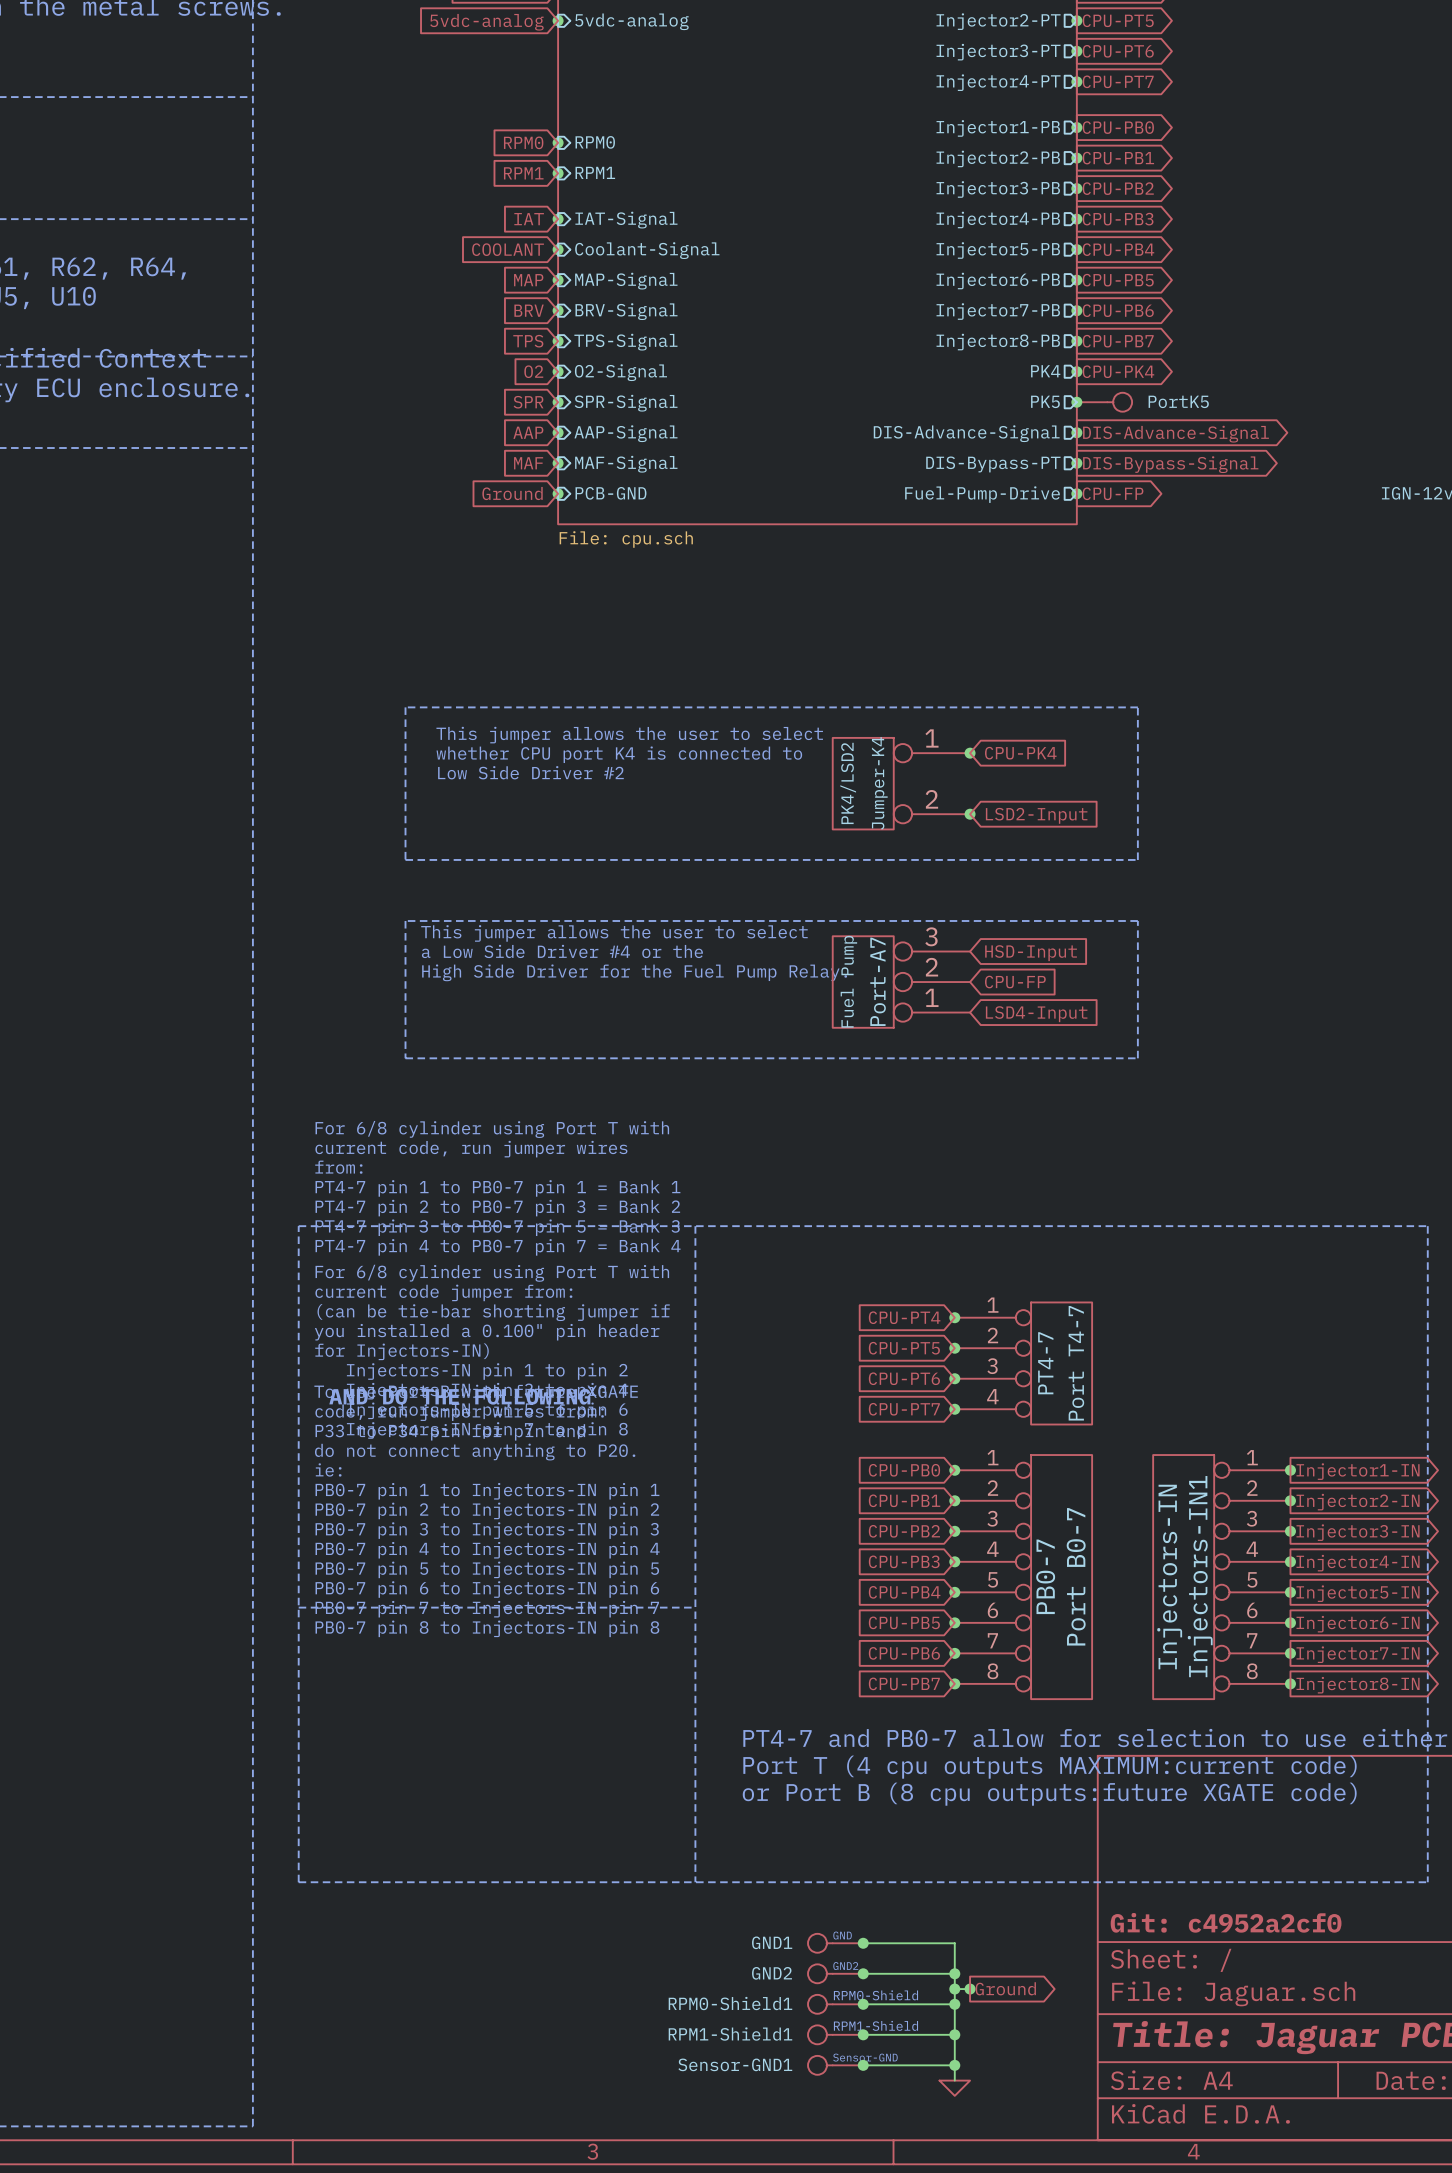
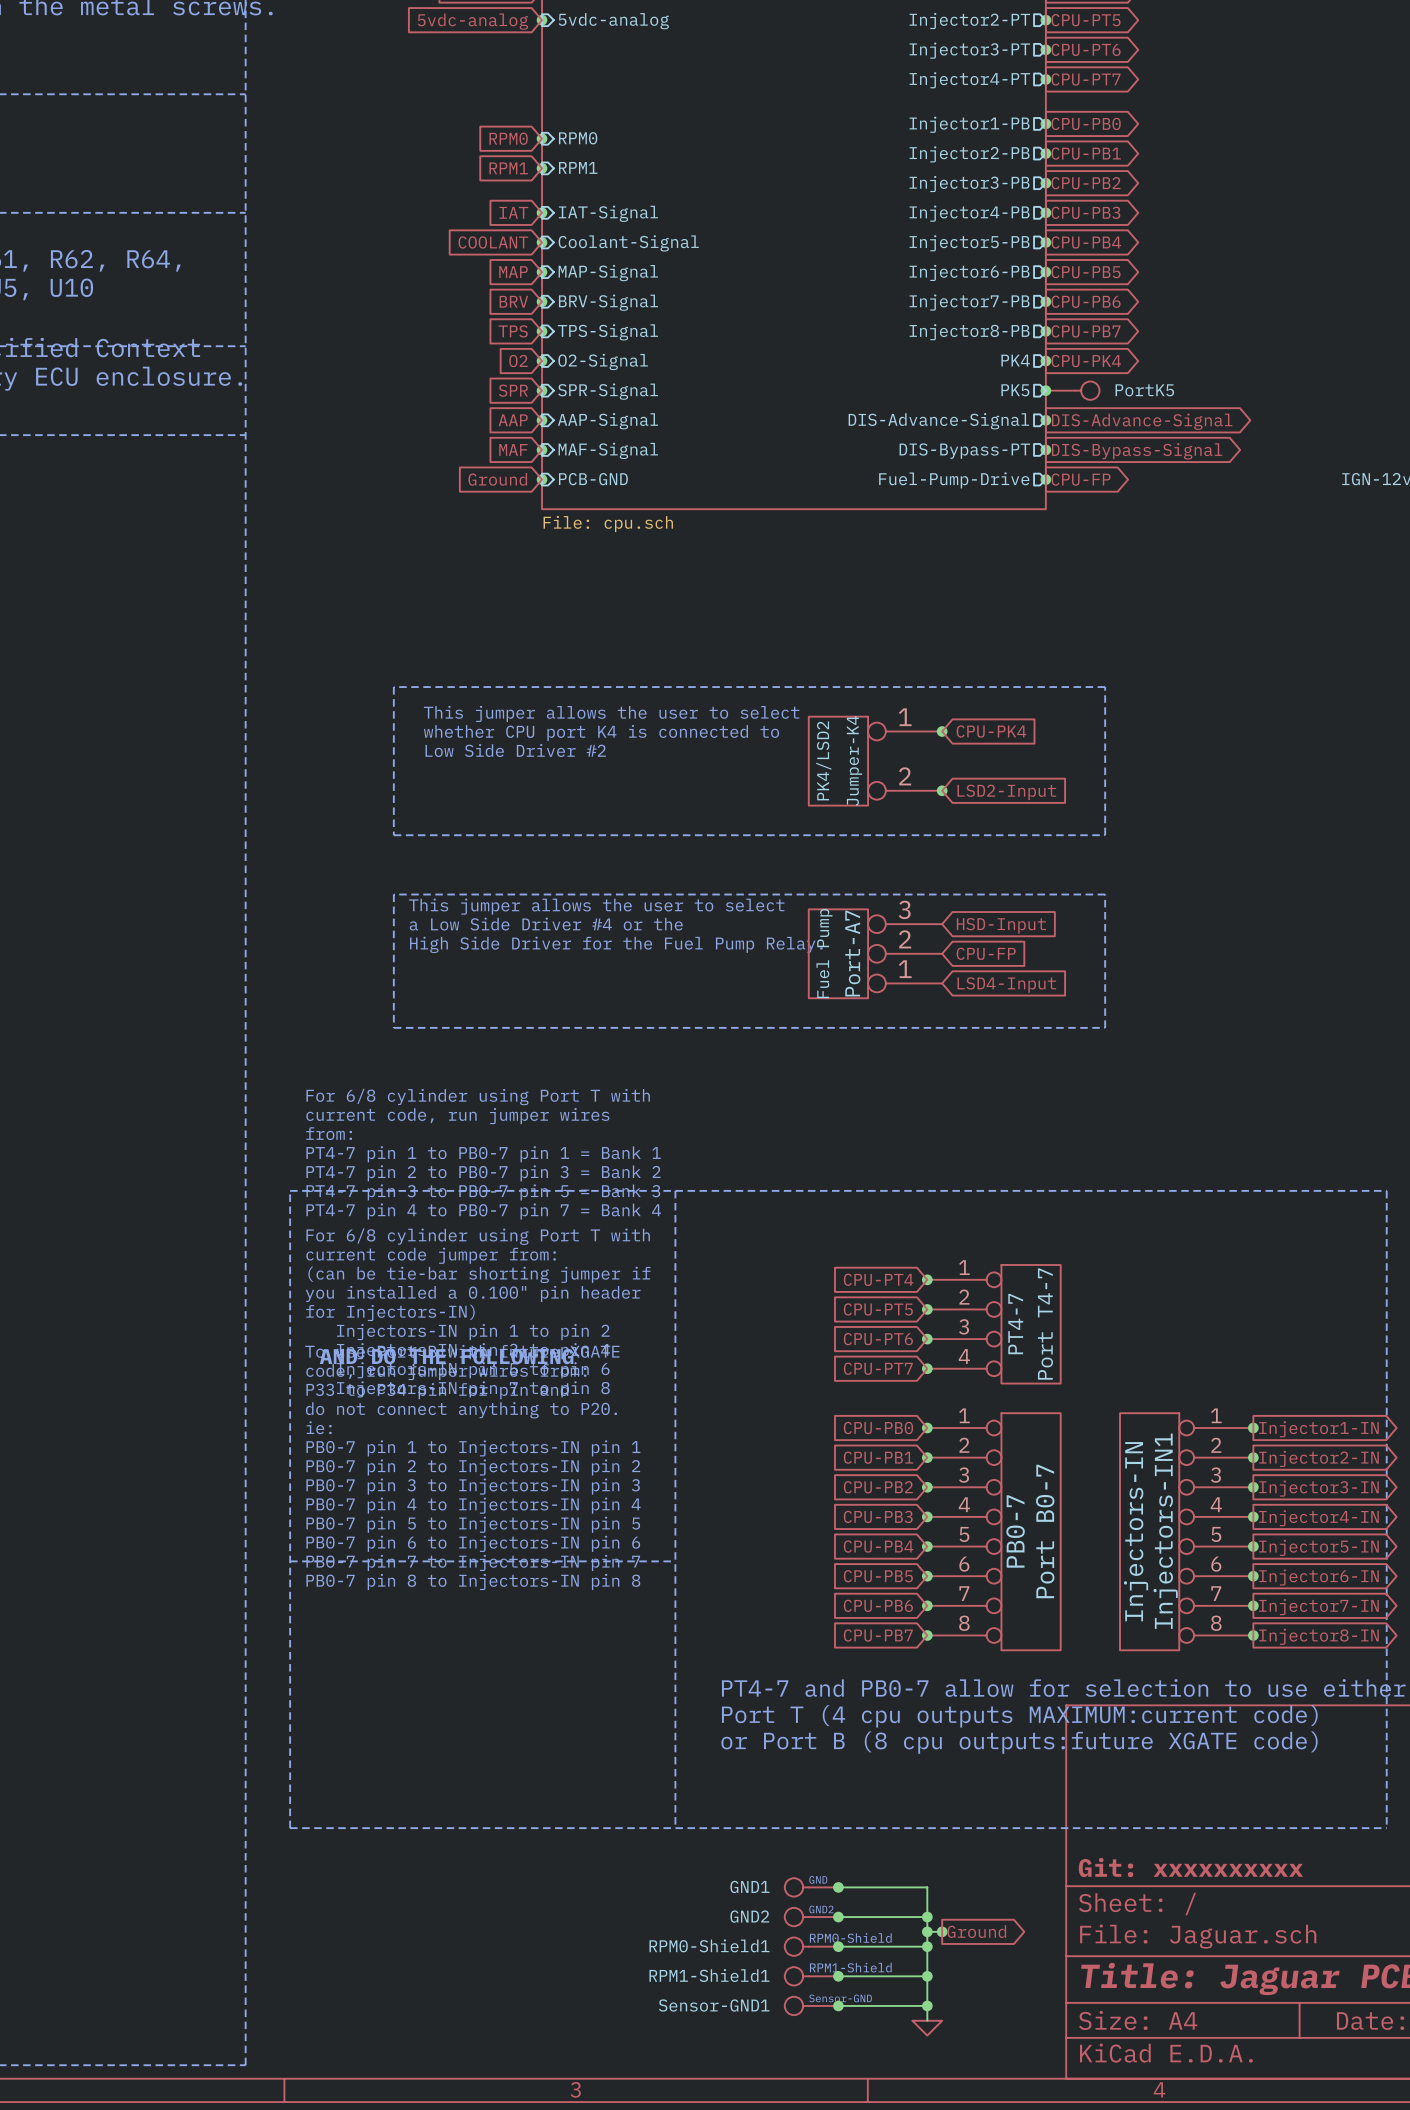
title block: Git: c4952a2cf0 (1226, 1922) -> Git: xxxxxxxxxx (1190, 1867)

